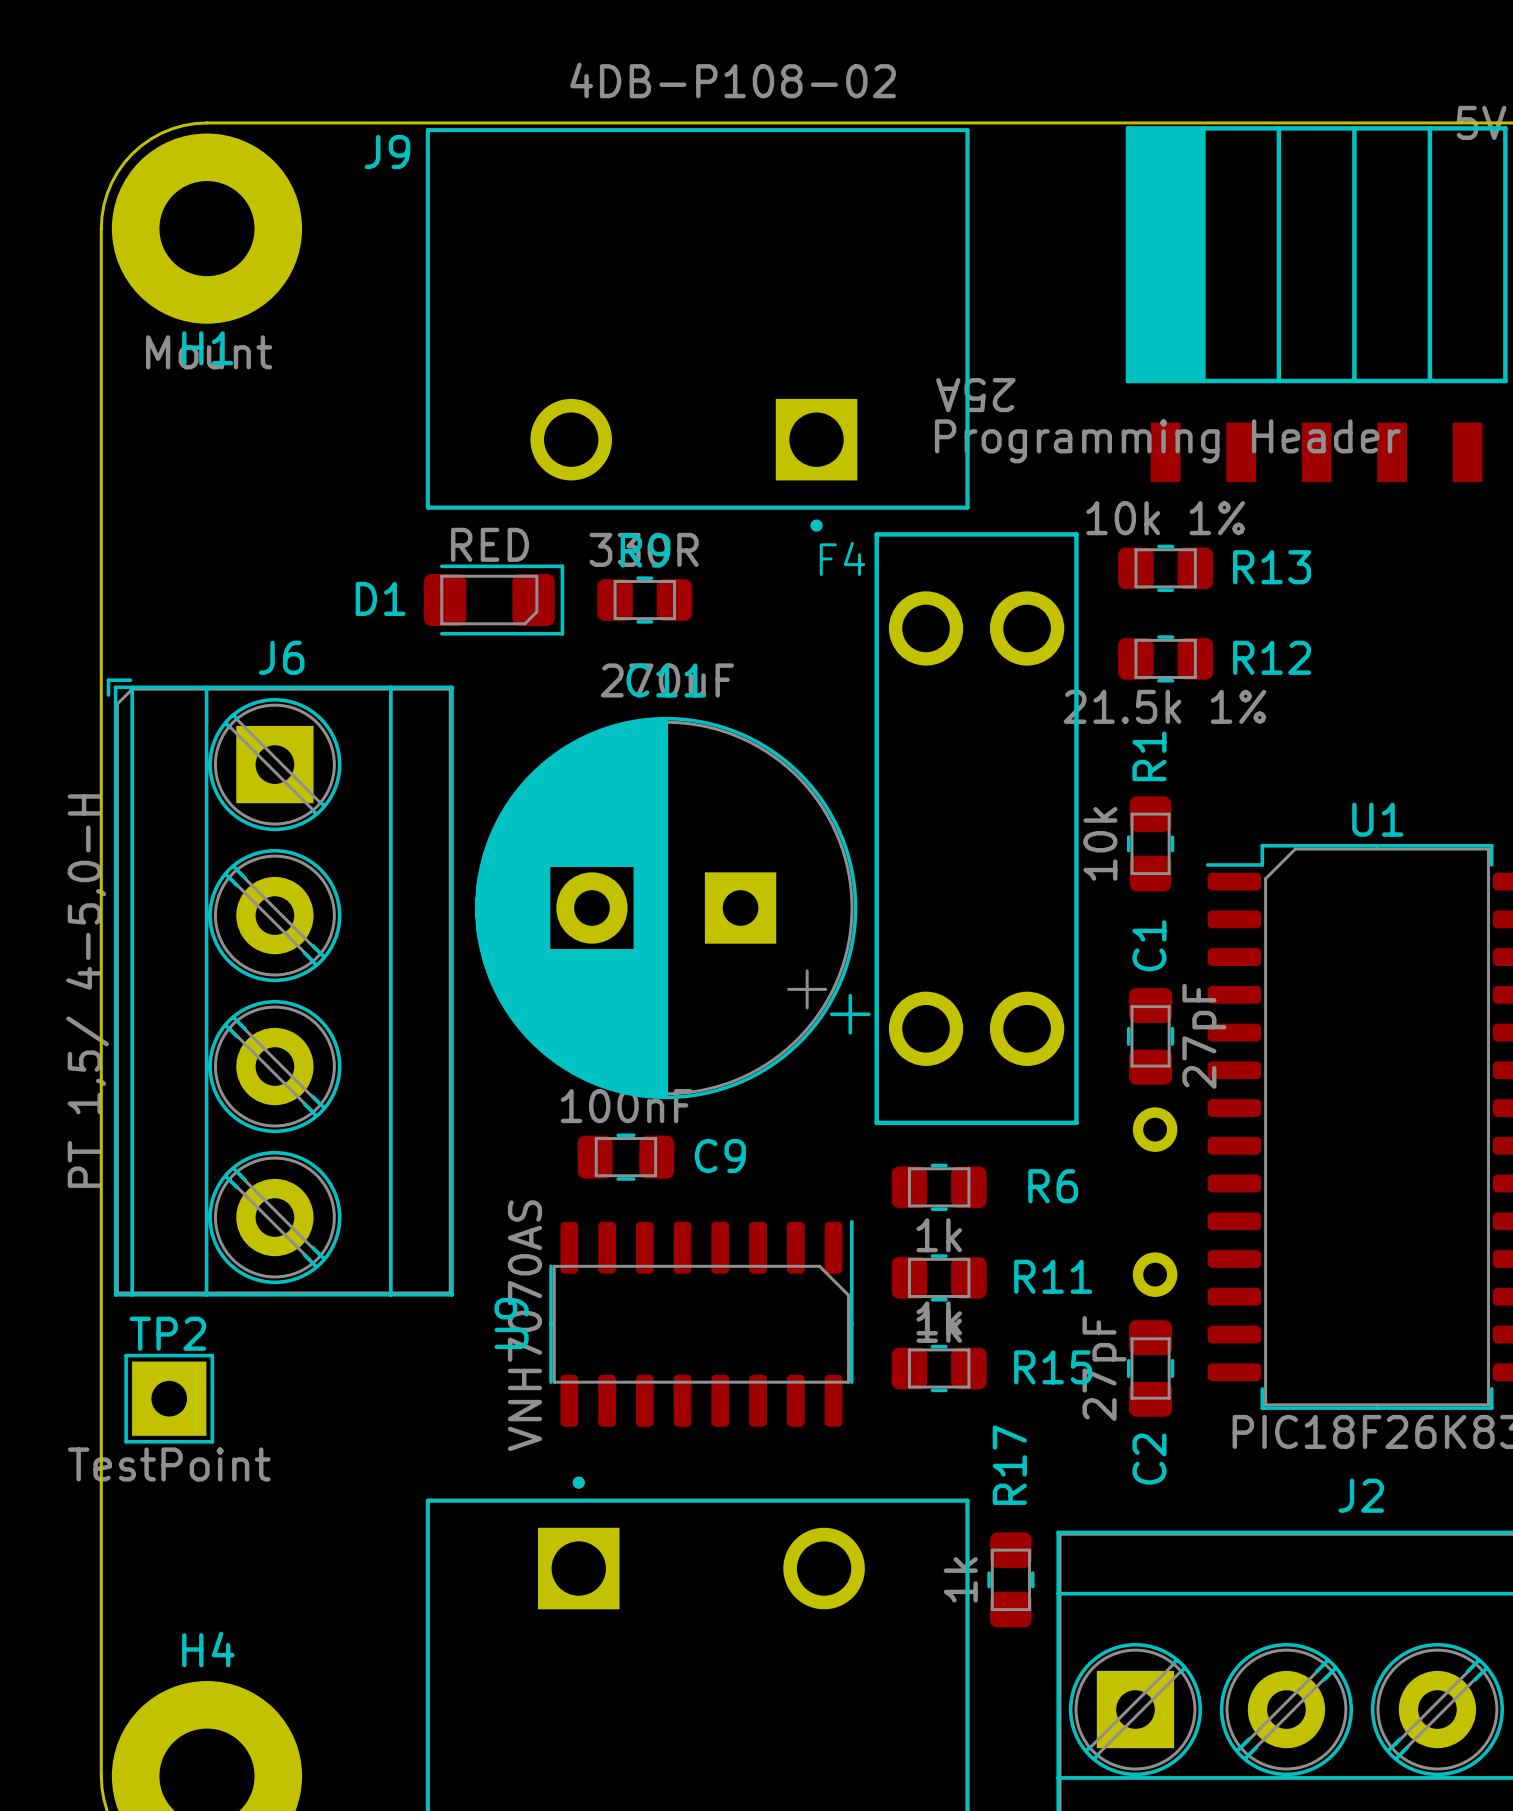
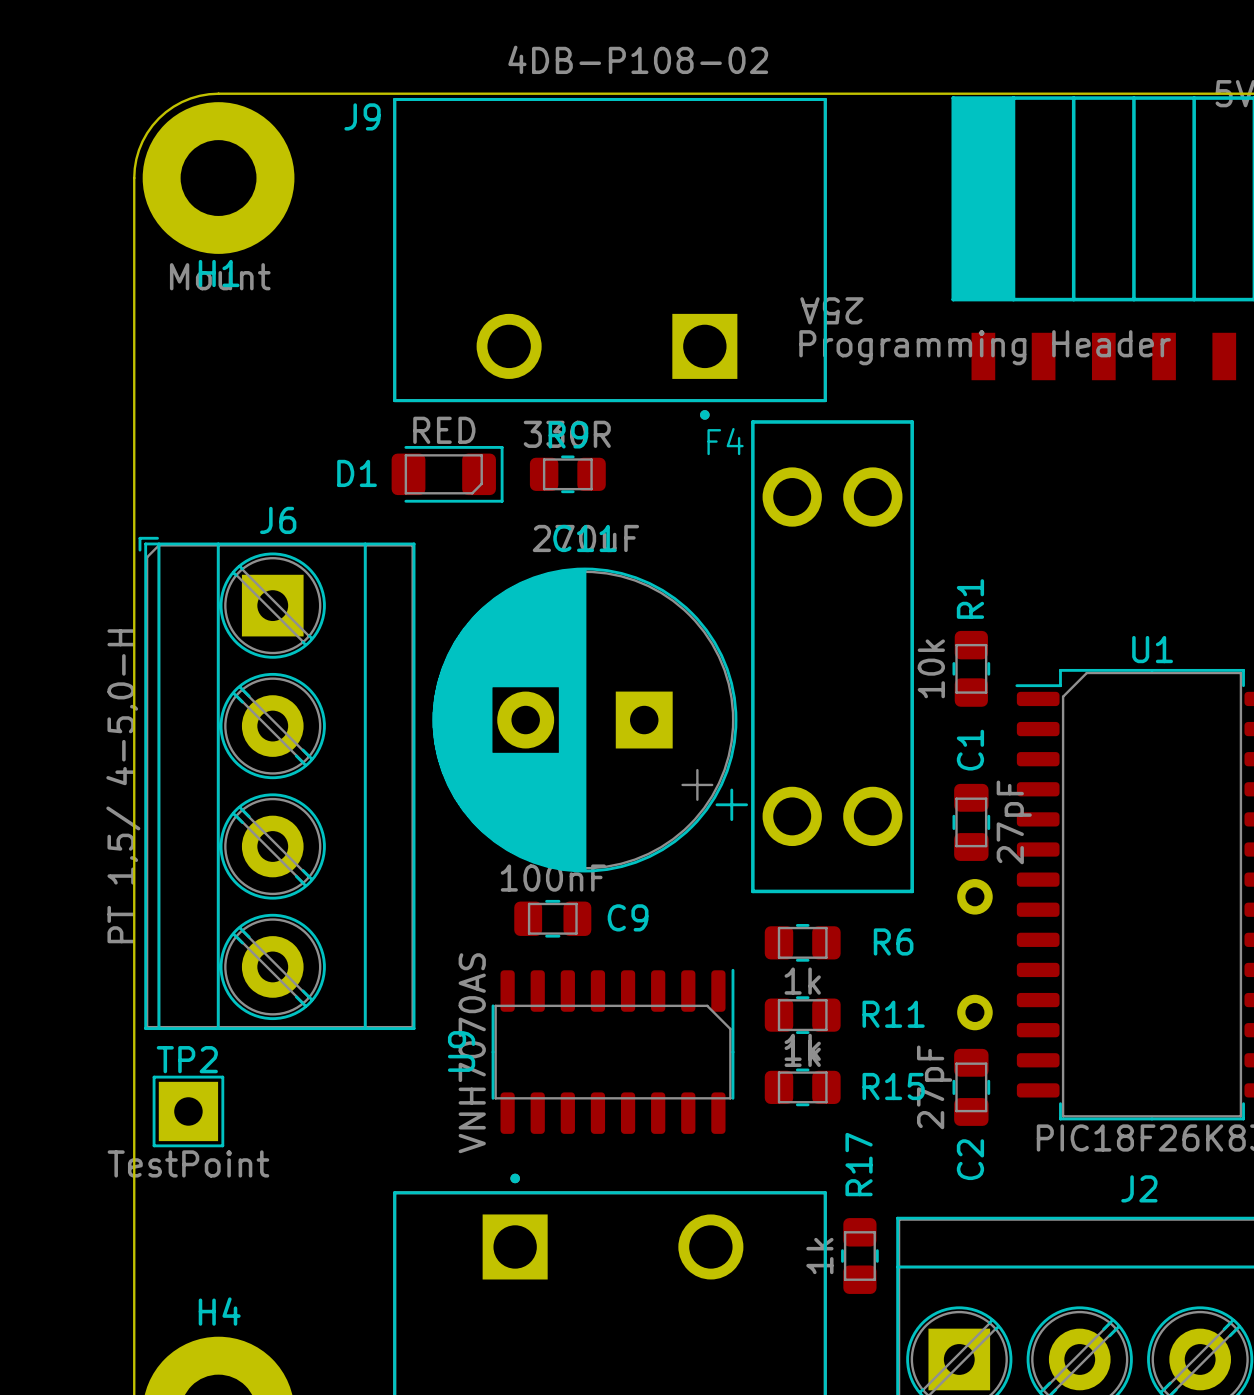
R13: 10k 1% (1165, 568) -> none
R12: 21.5k 1% (1165, 658) -> none

